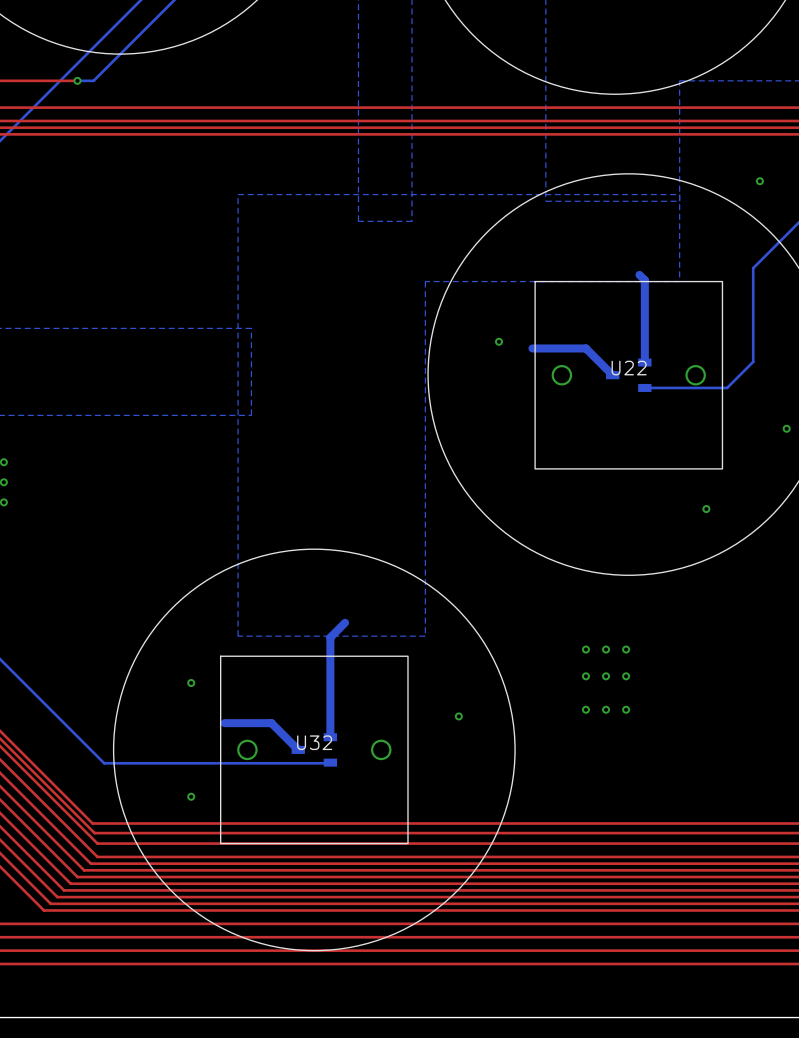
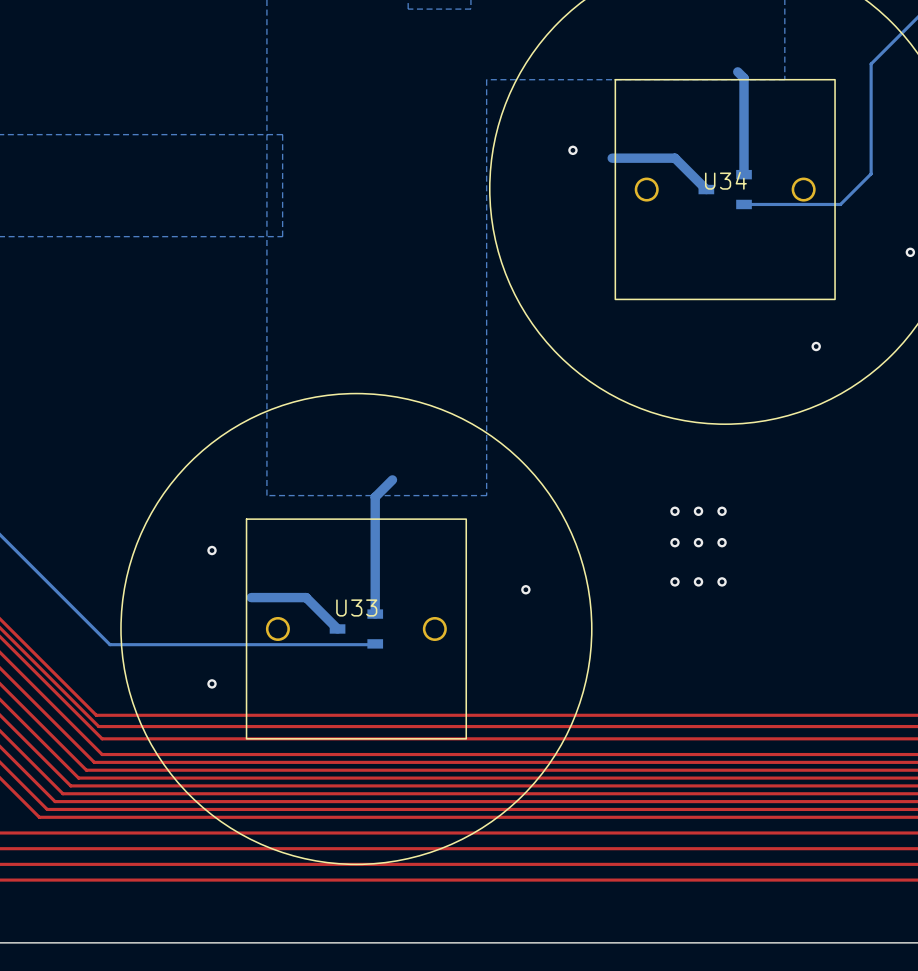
U22 name: U22 (629, 368) -> U34 (725, 180)
U32 name: U32 (314, 742) -> U33 (356, 607)

